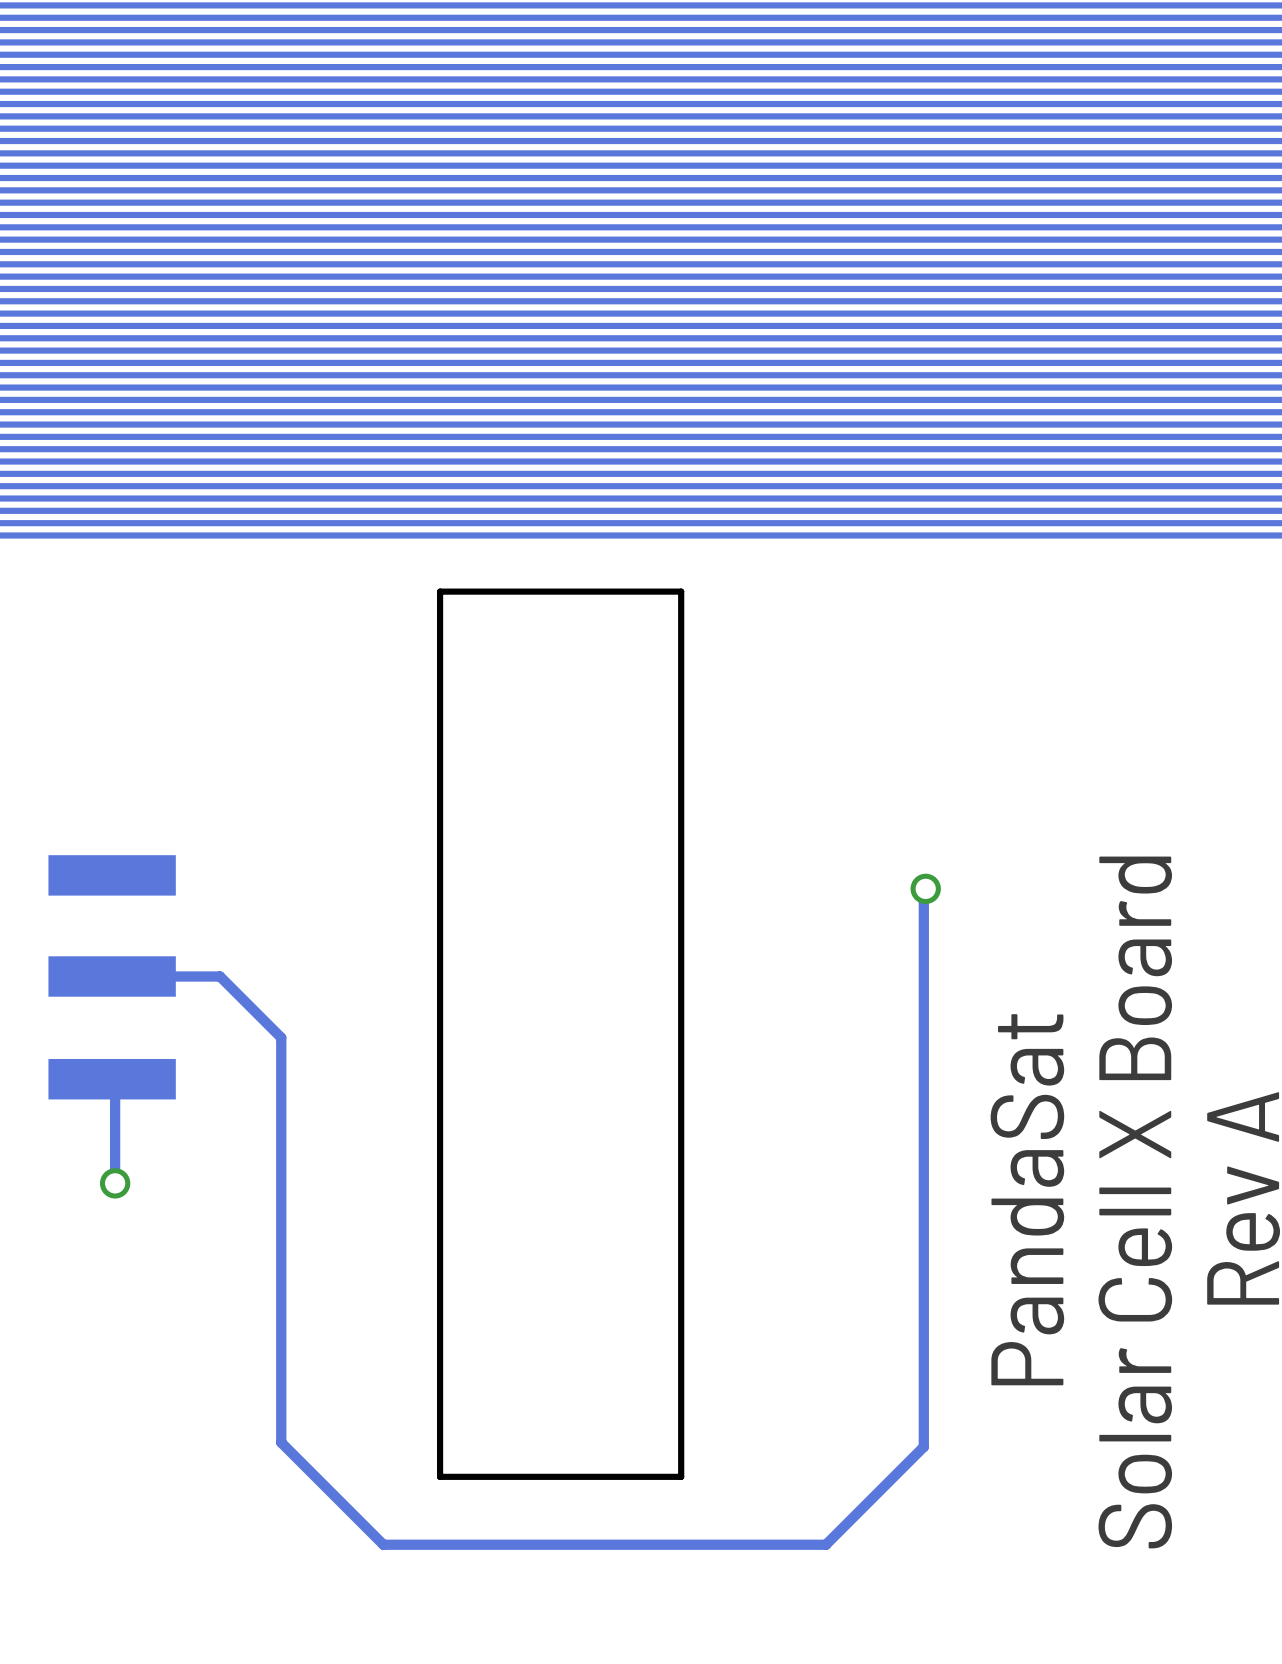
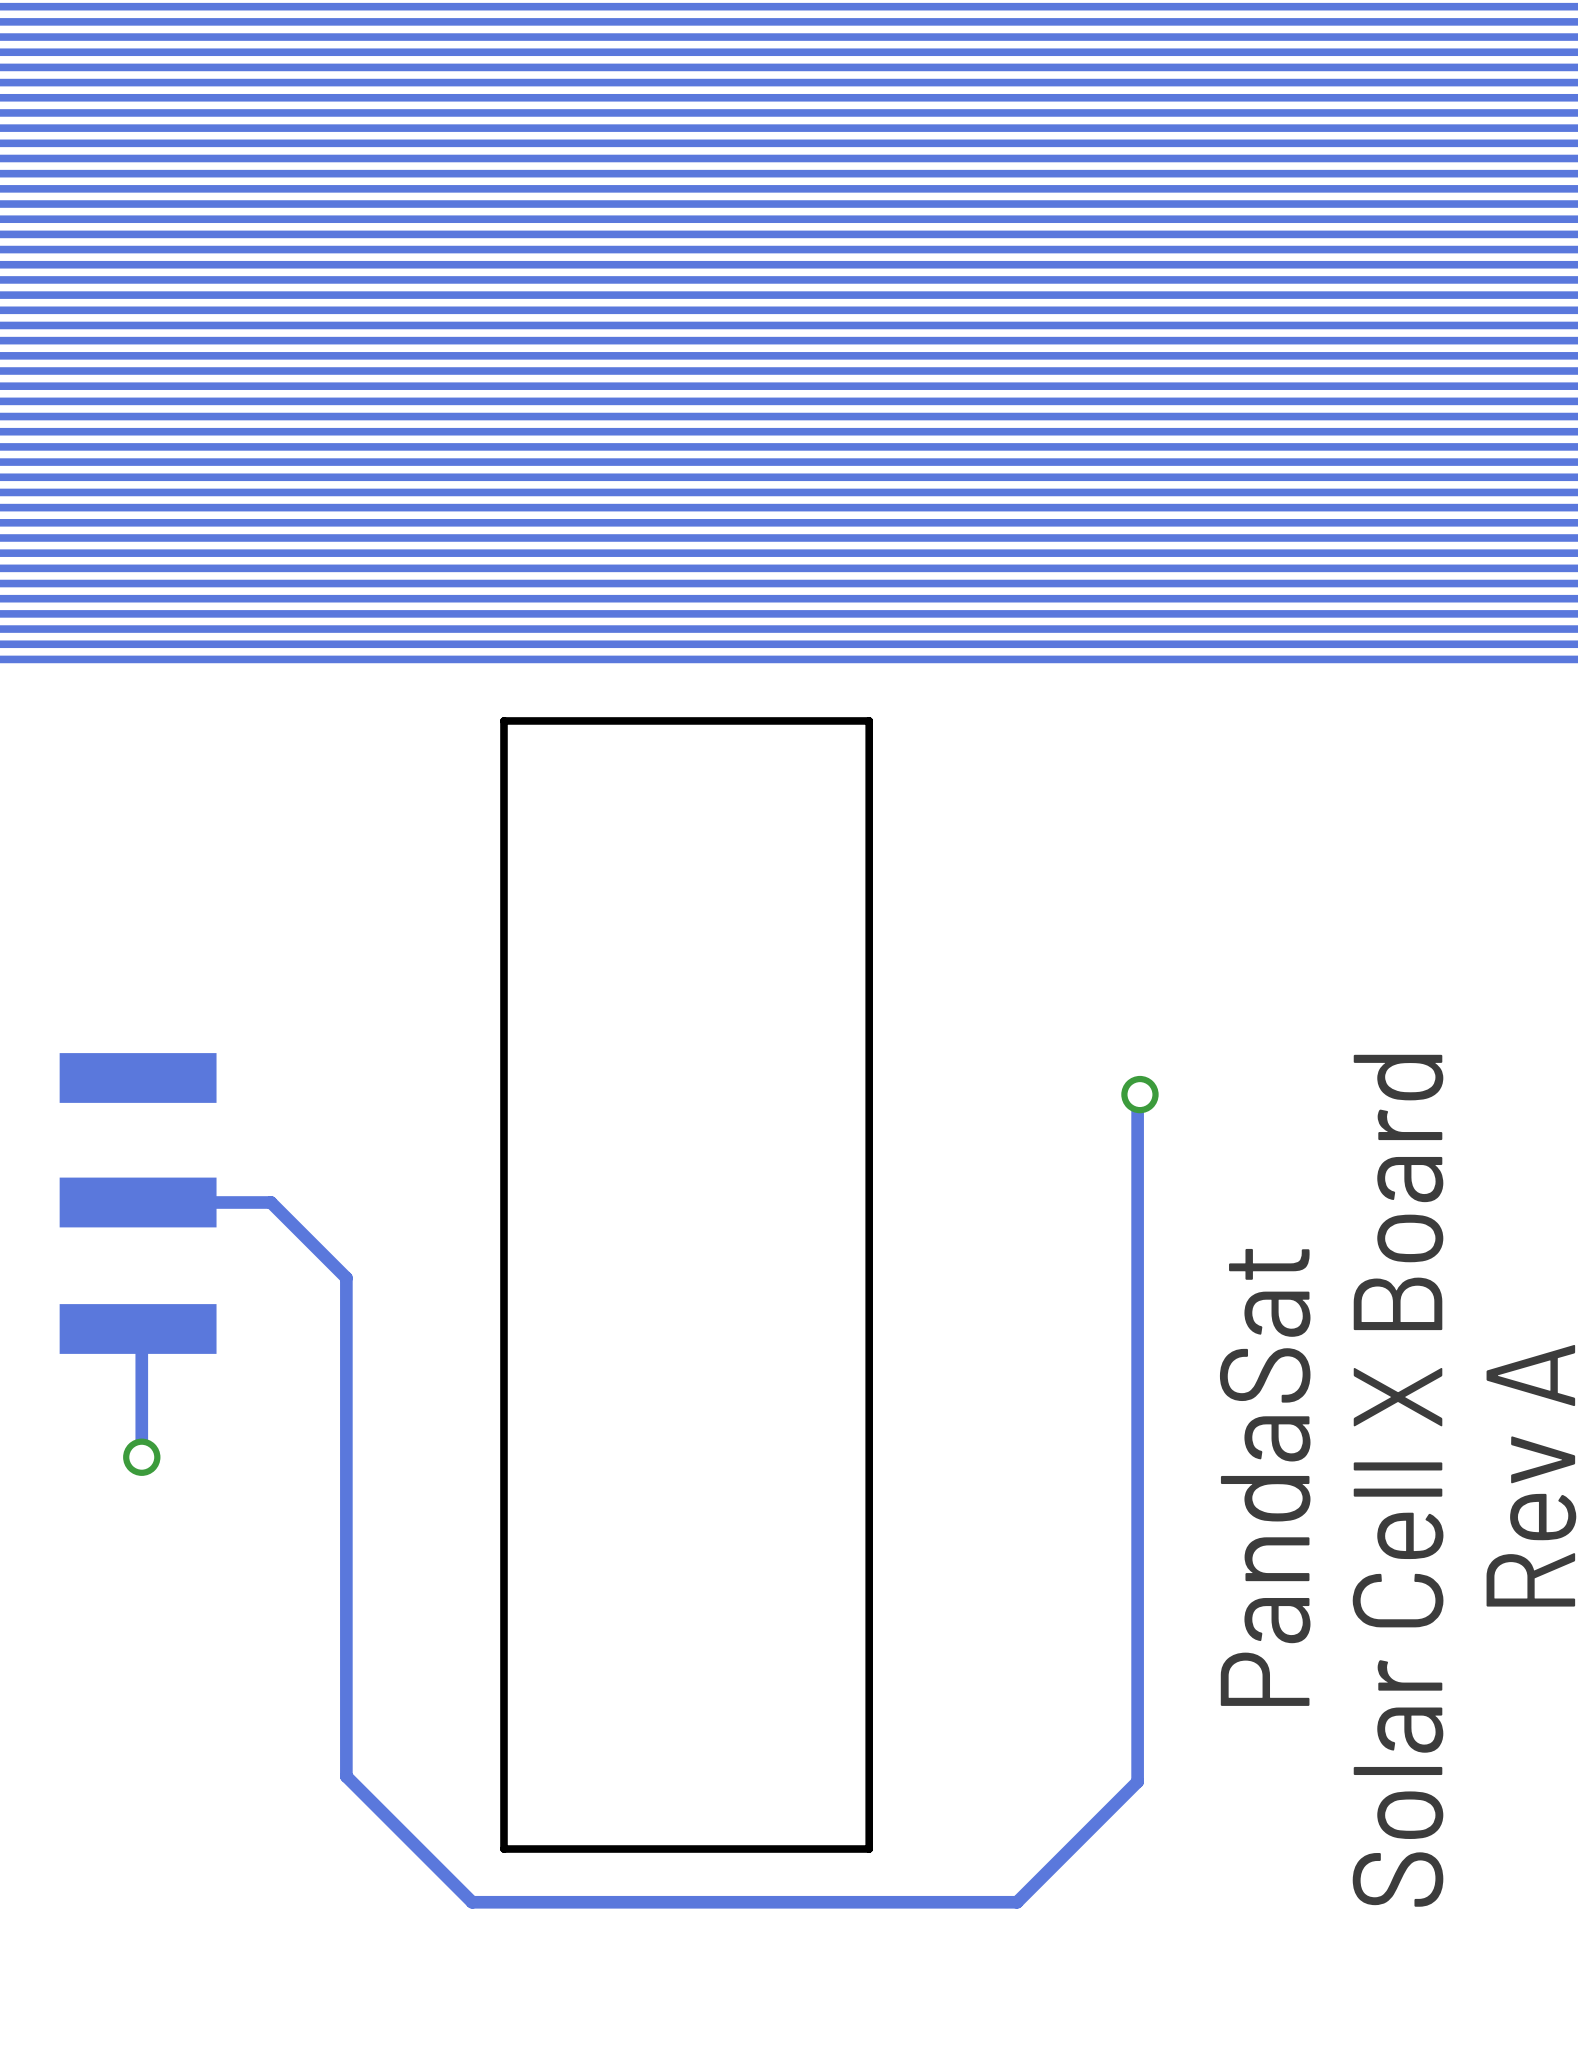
board edge: (681, 591) (440, 591) (440, 1476) (681, 1476) (681, 591) -> (869, 720) (869, 1849) (503, 1849) (503, 720) (869, 720)

